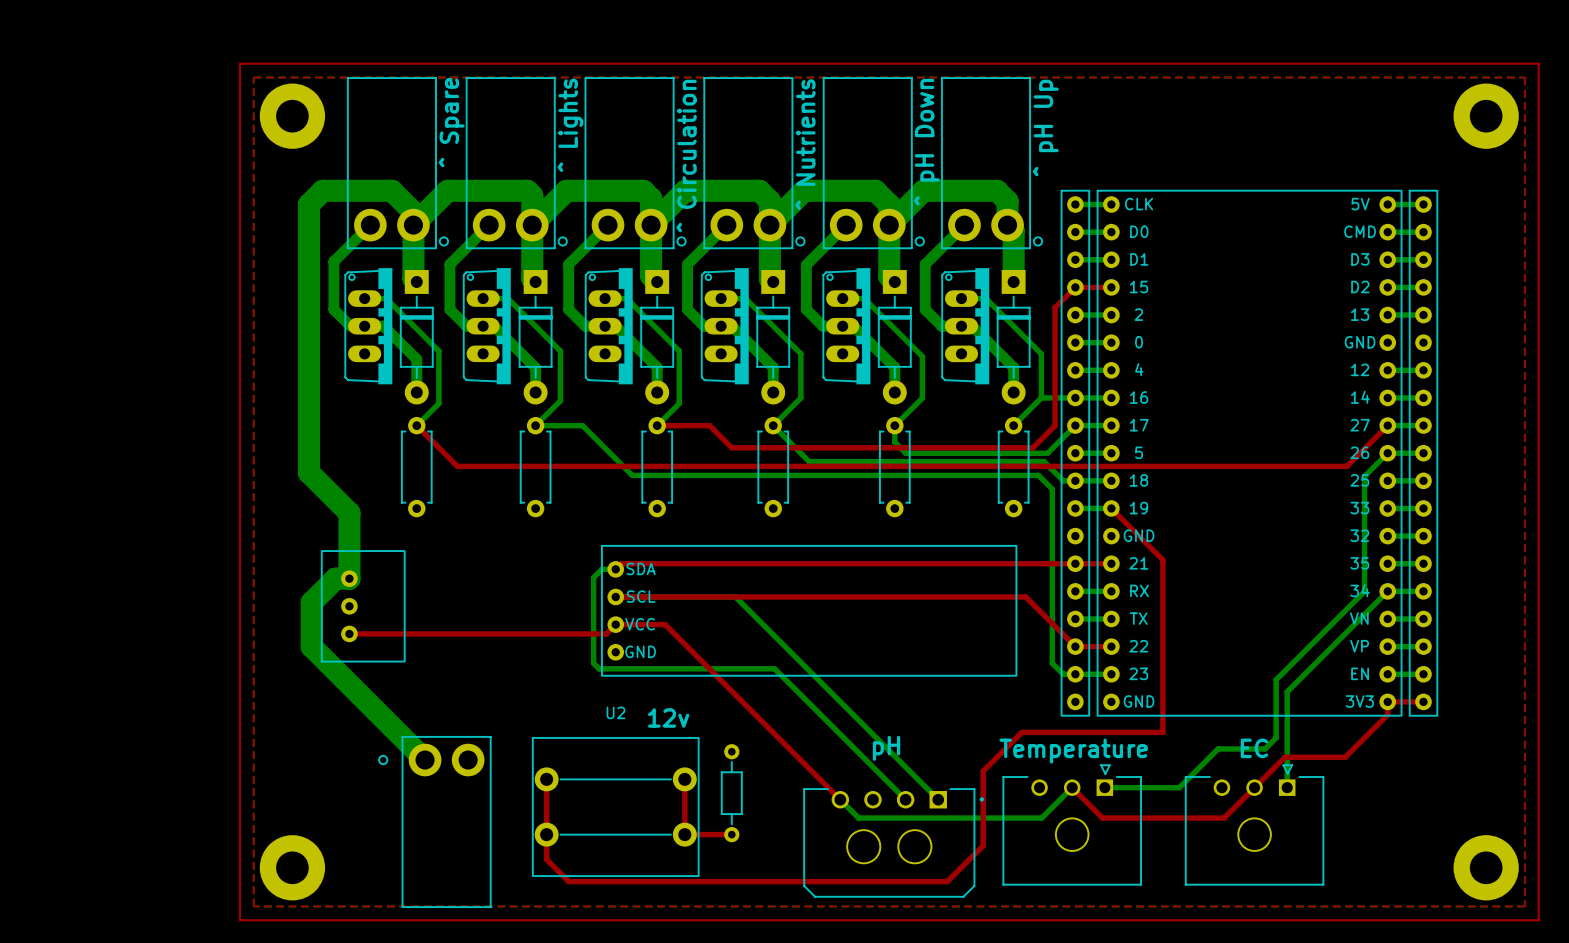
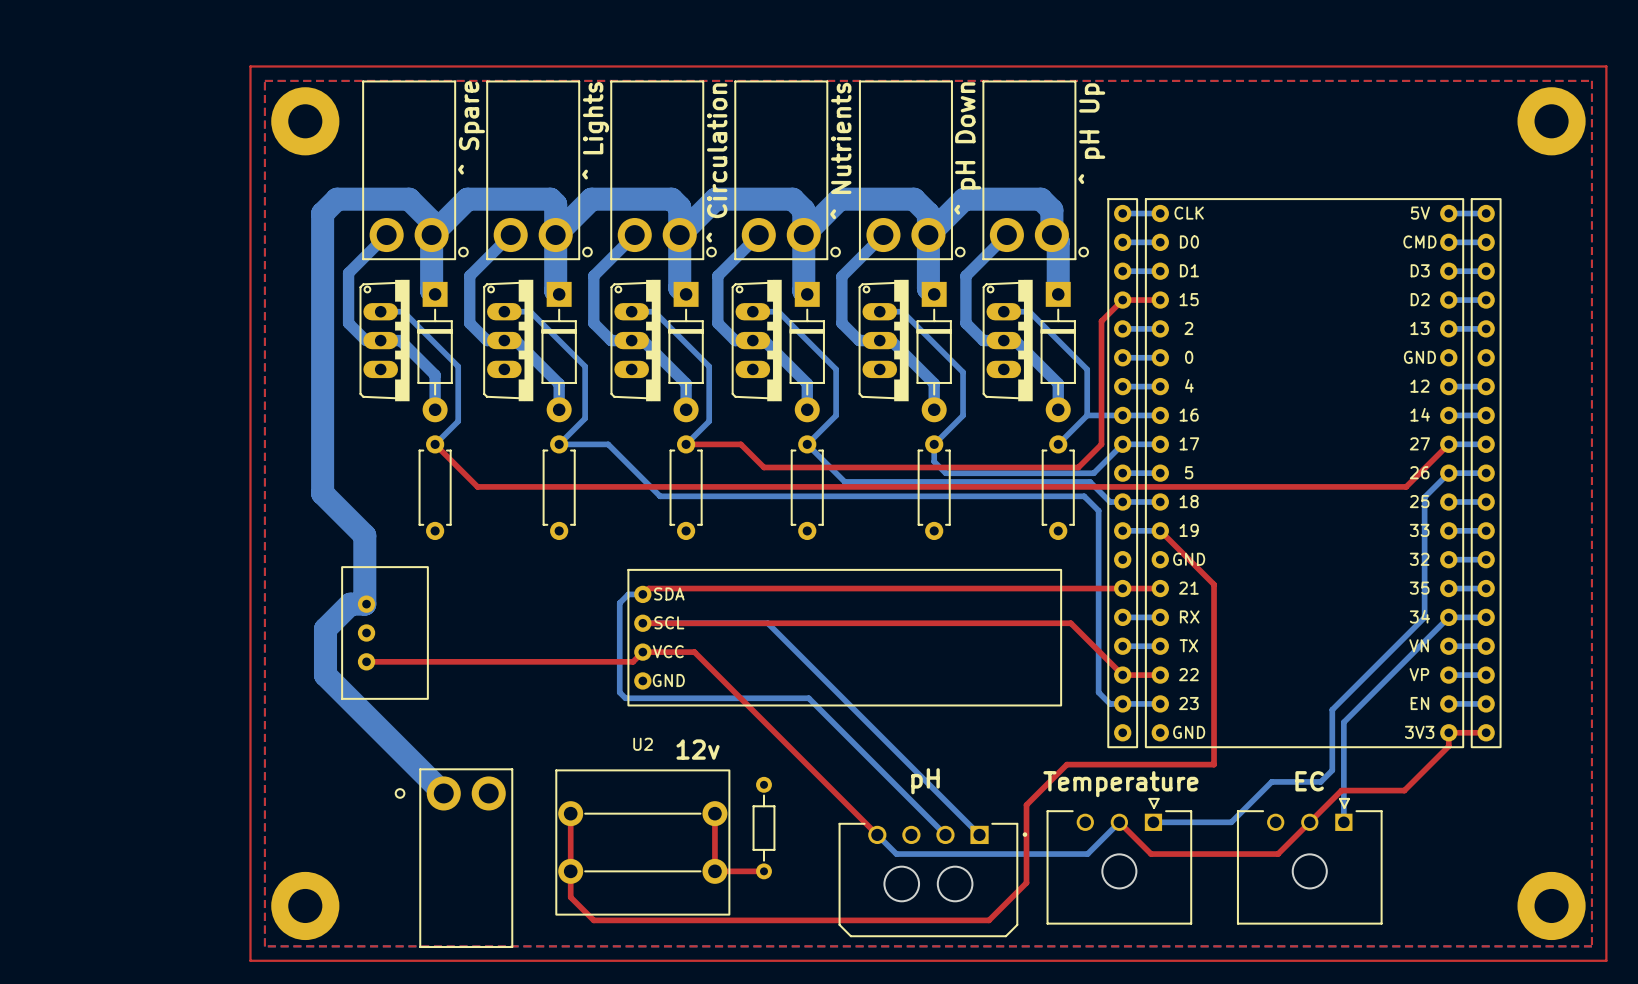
part footprint: [321, 550, 406, 663] -> [341, 566, 429, 700]

